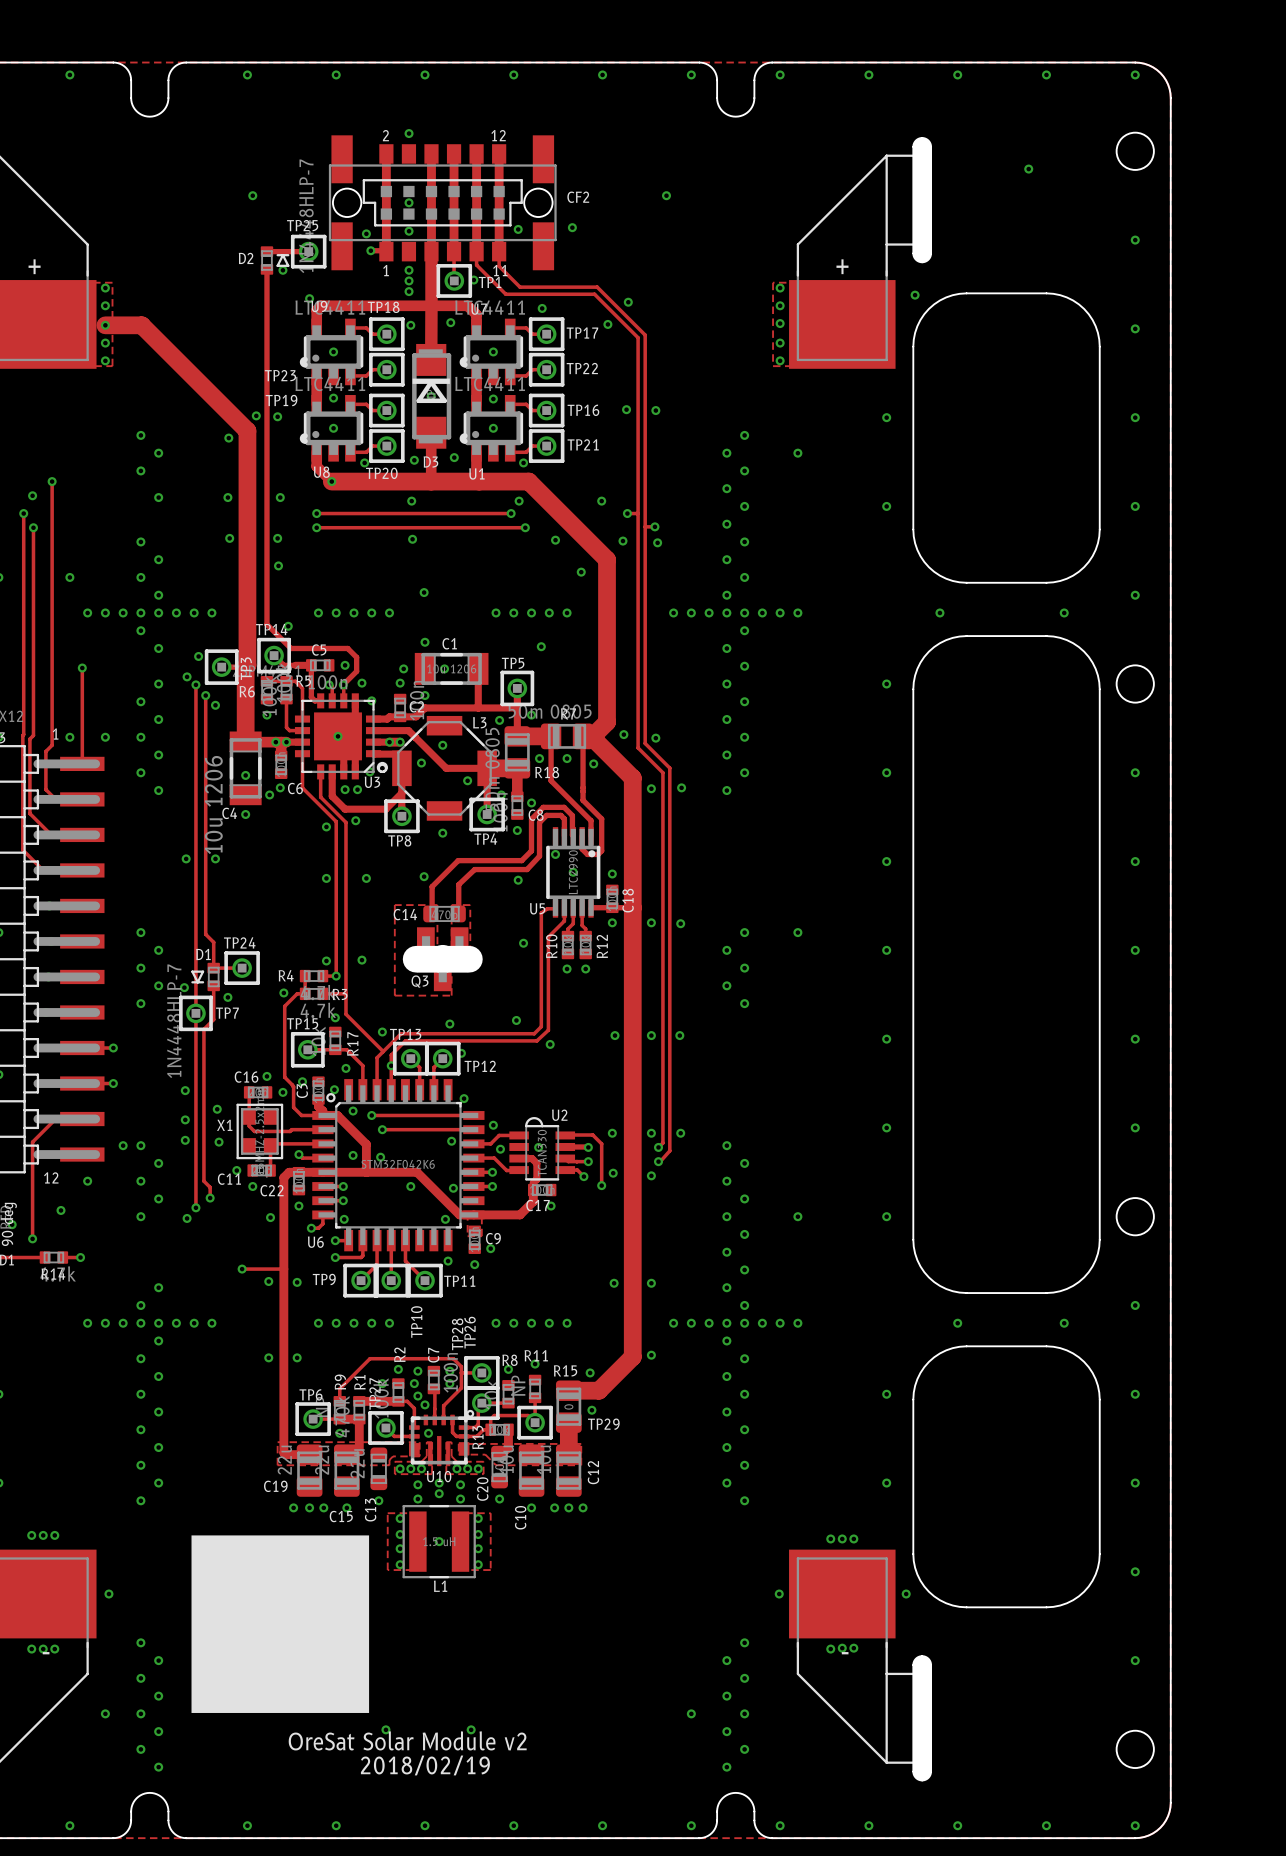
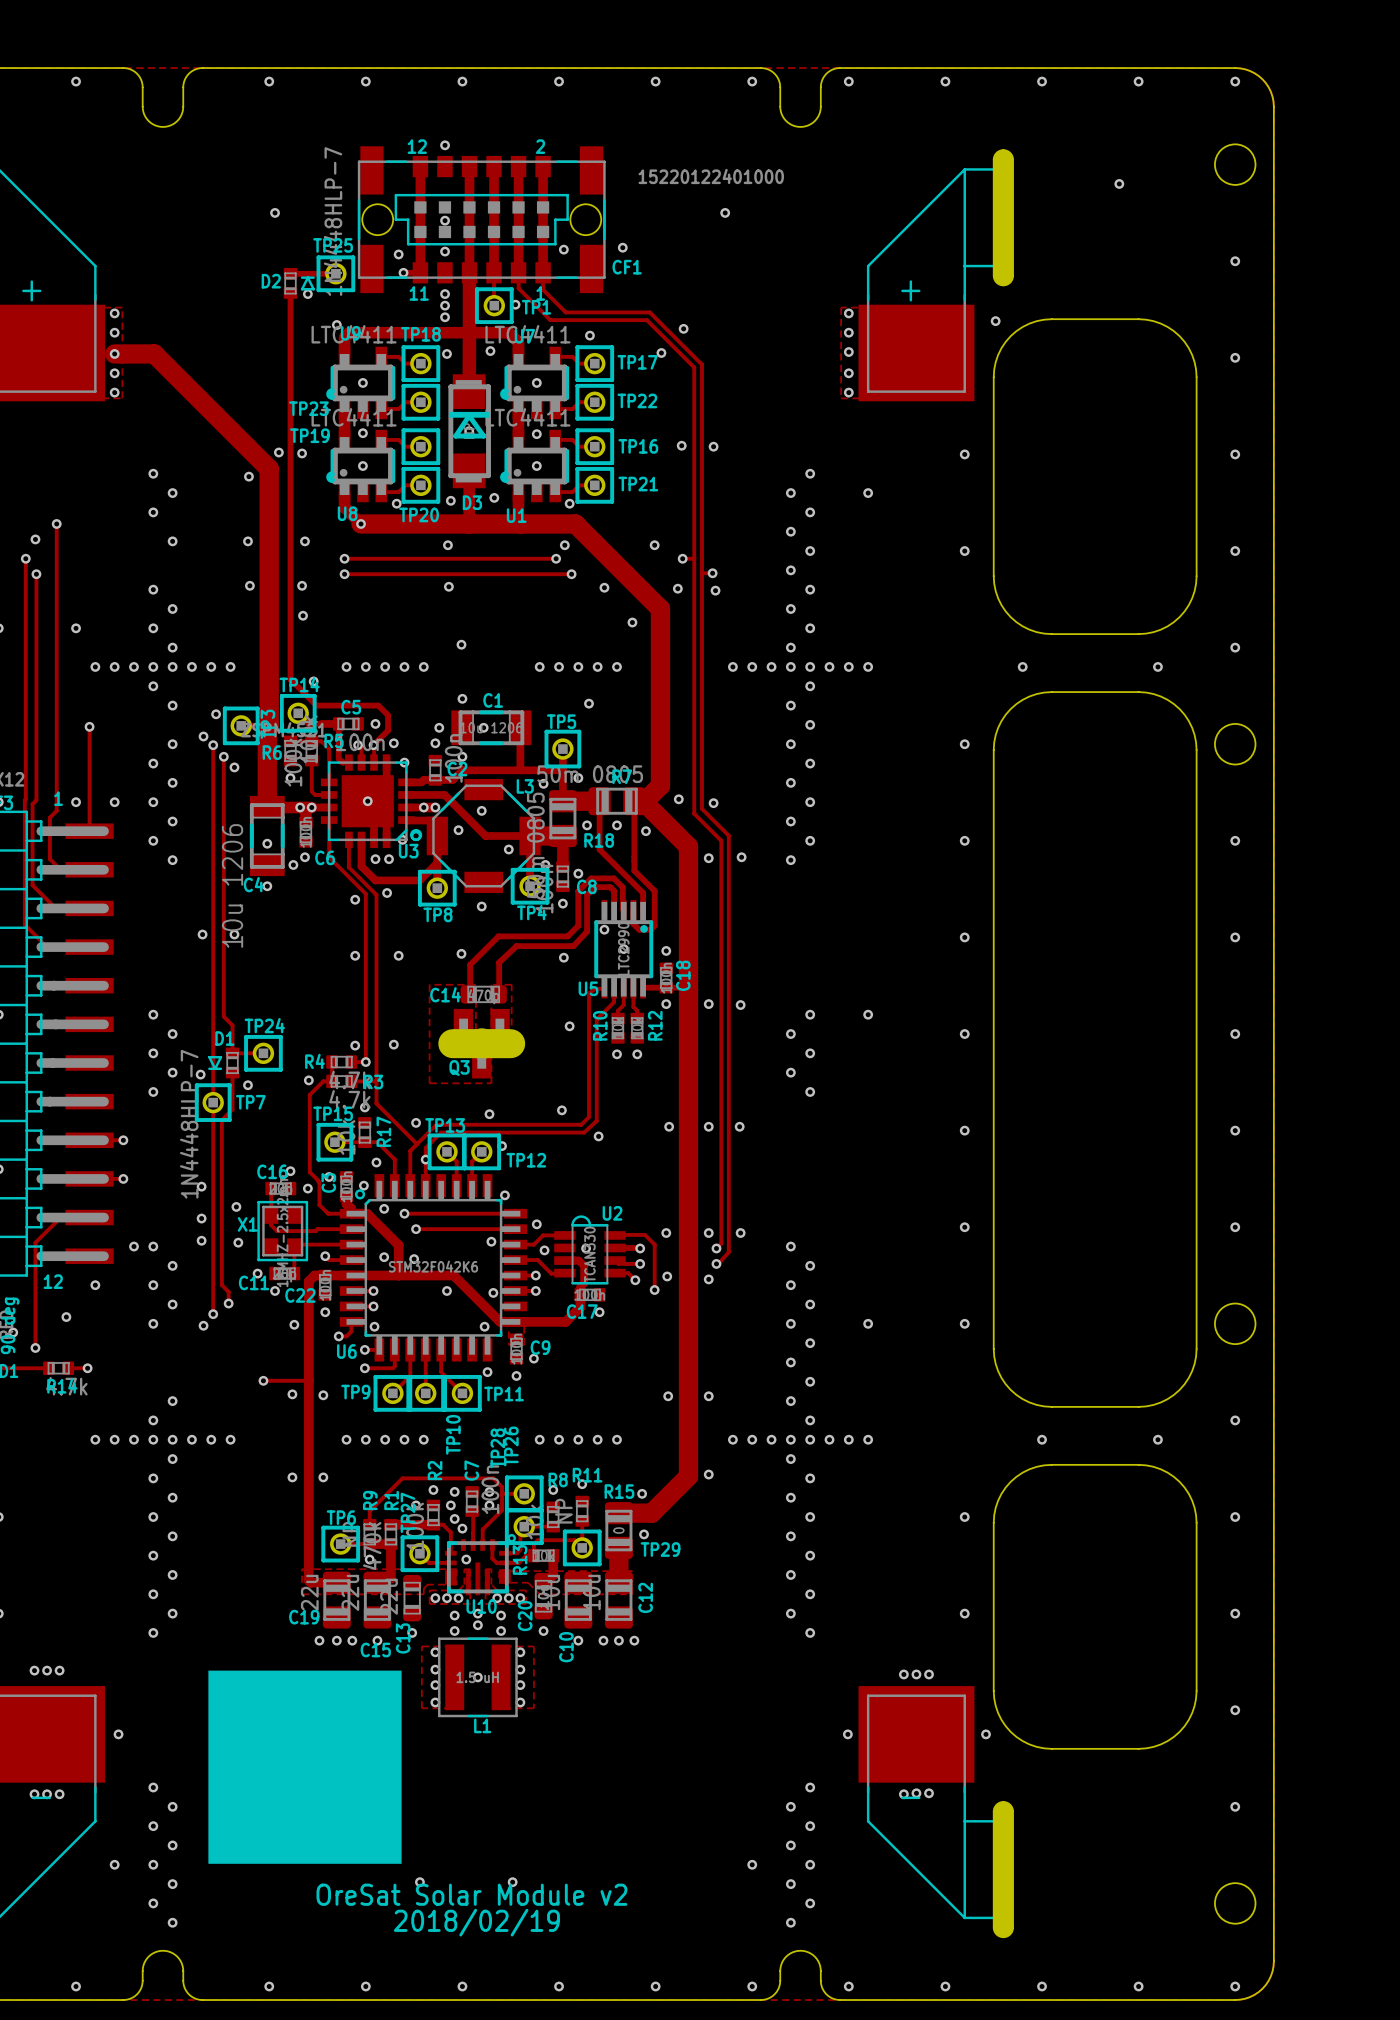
CF1: none -> 15220122401000 (481, 219)
CF2: (442, 202) -> none

